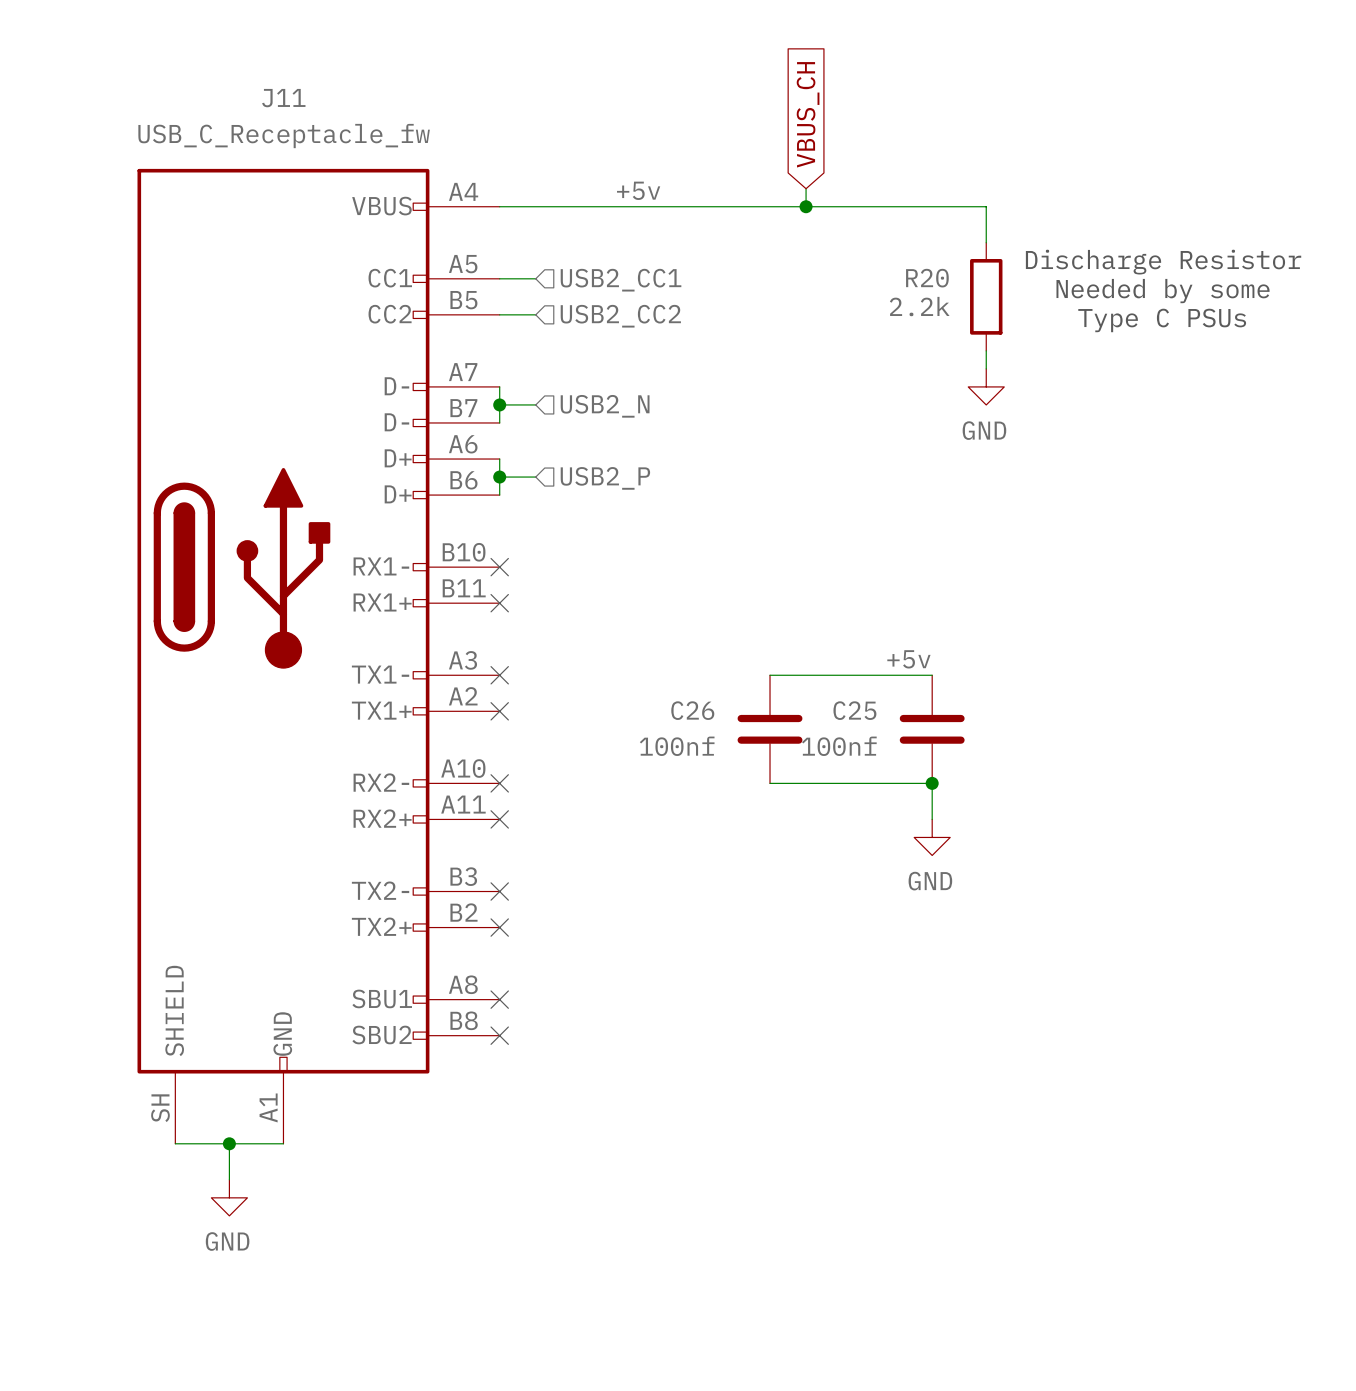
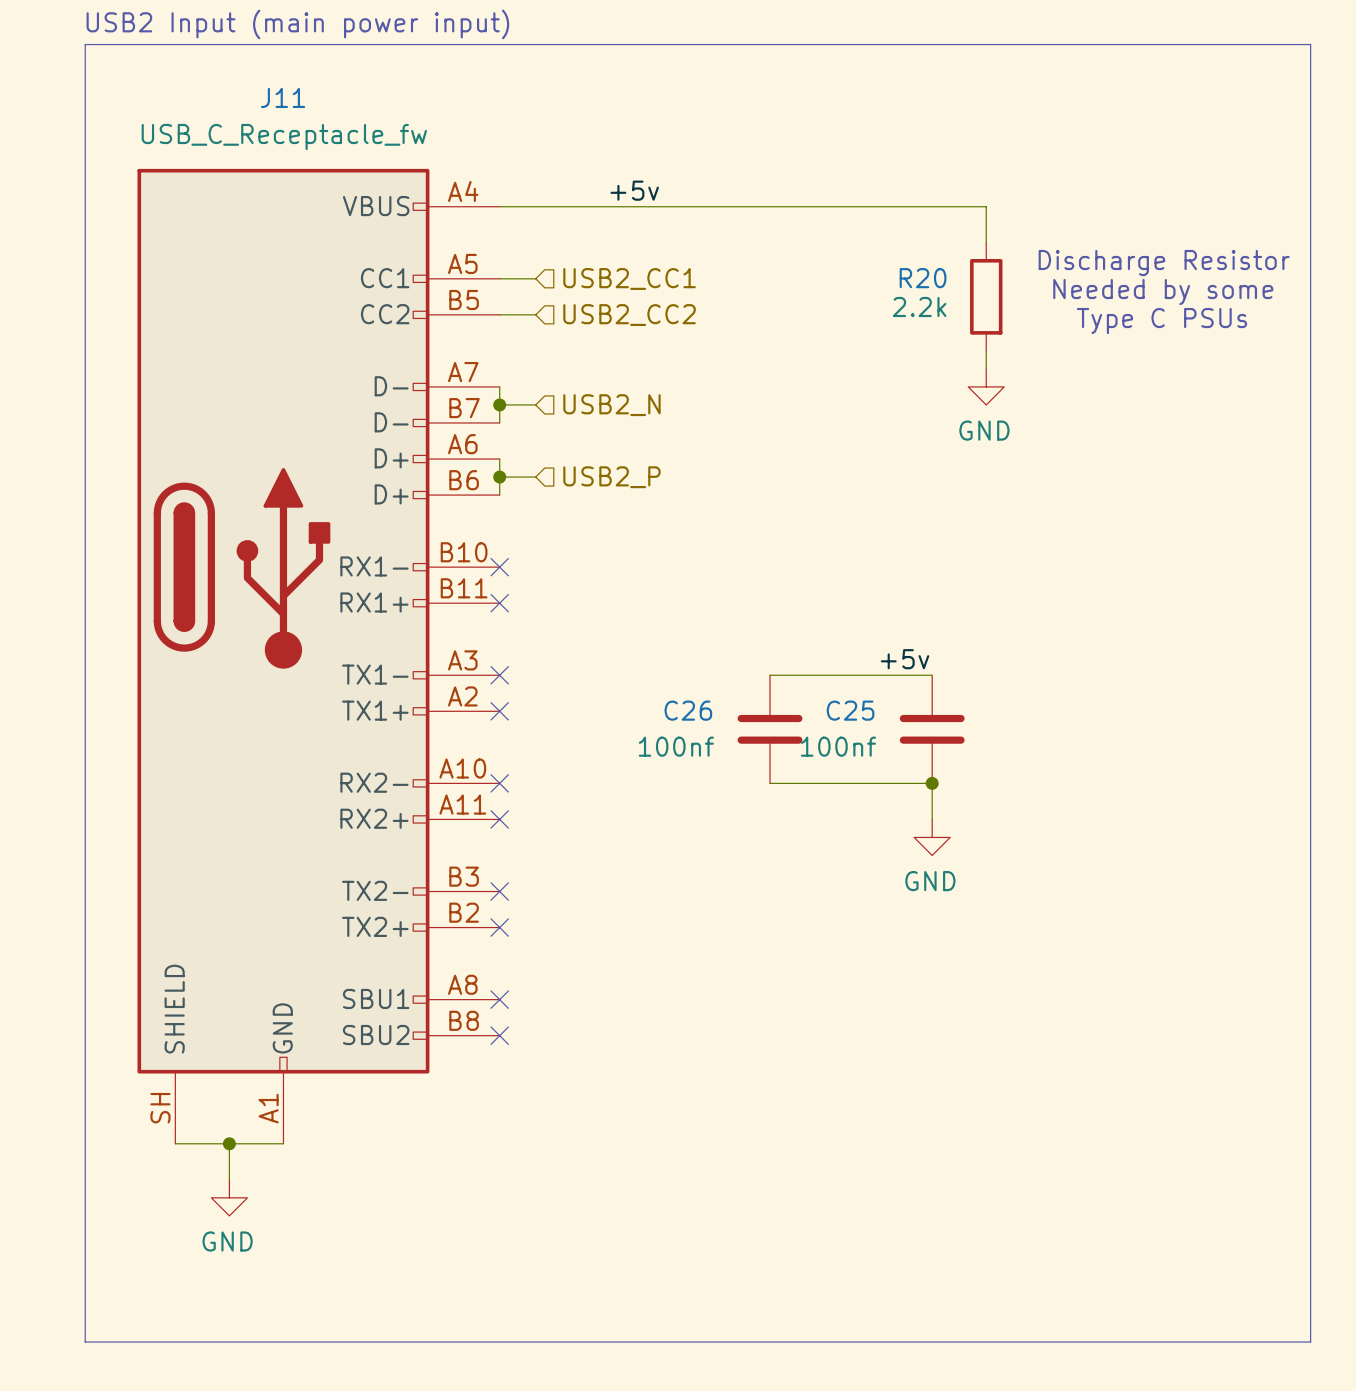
text: none -> USB2 Input (main power input) (297, 24)
line: none -> (85, 44) (1310, 44) (1310, 1342) (85, 1342) (85, 44)
global label: VBUS_CH (808, 114) -> none
wire: (806, 188) (806, 206) -> none
junction: (806, 206) -> none

